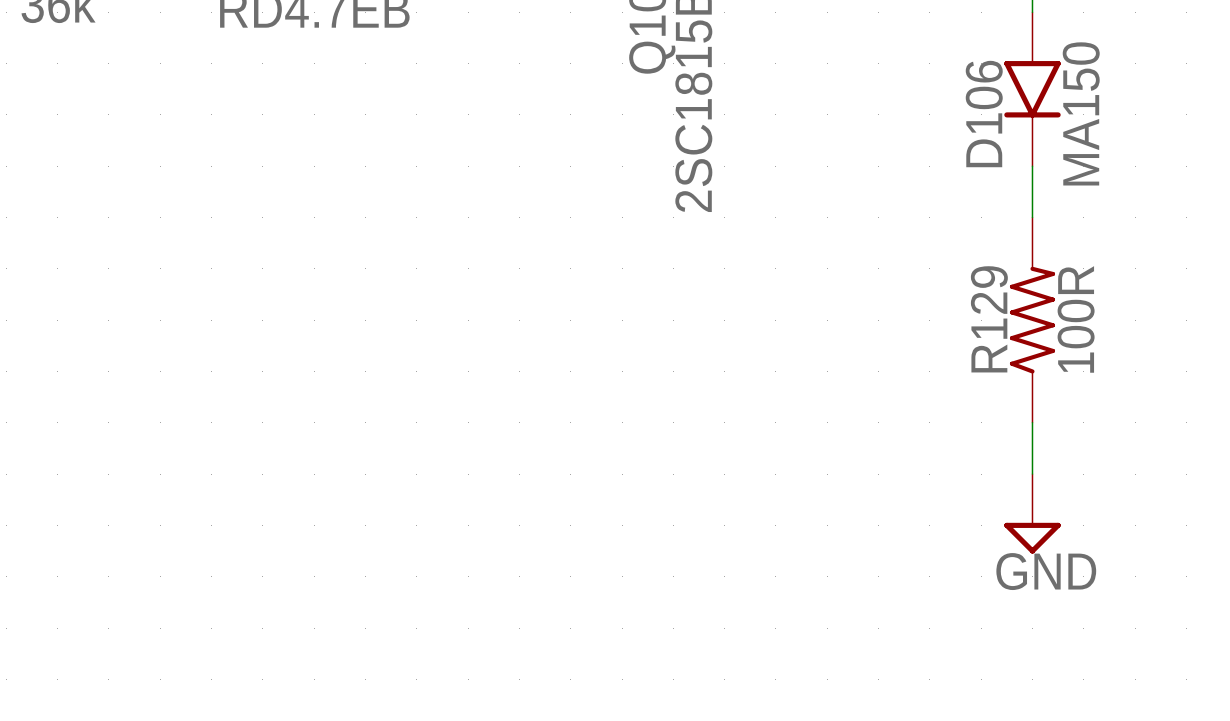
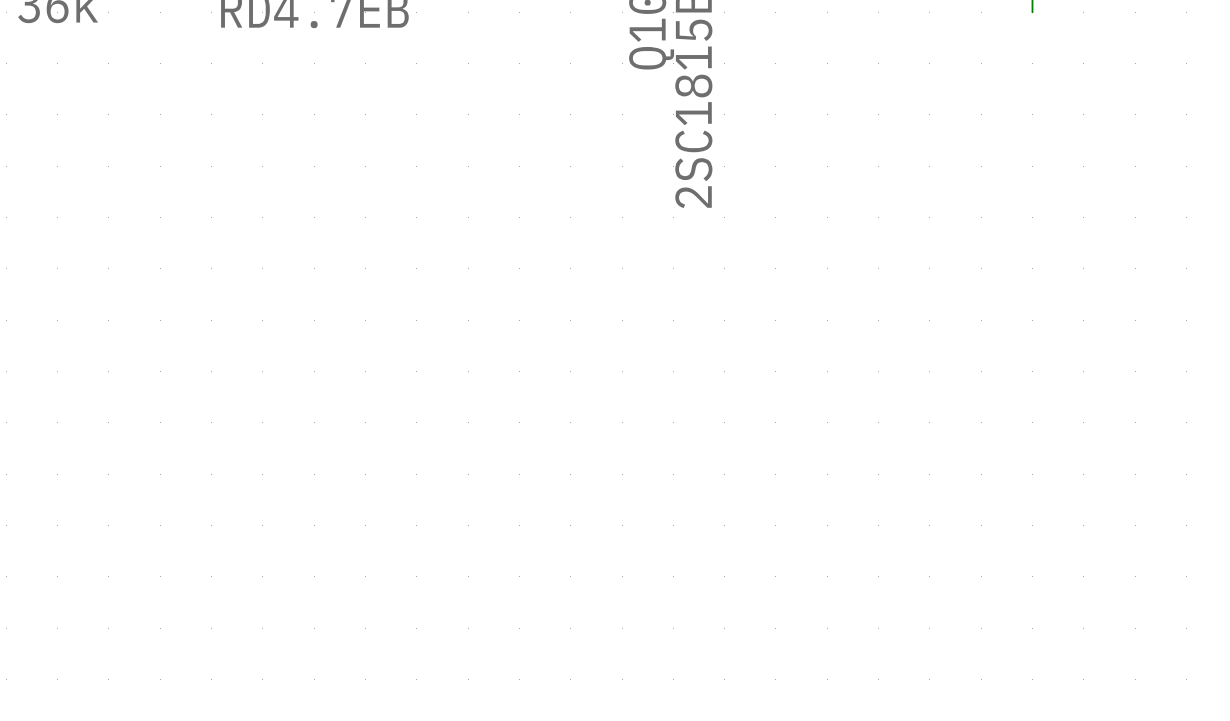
D106: MA150 (1032, 89) -> none
wire: (1032, 166) (1032, 217) -> none
R129: 100R (1032, 320) -> none
wire: (1032, 422) (1032, 474) -> none
power symbol: GND (1032, 513) -> none

